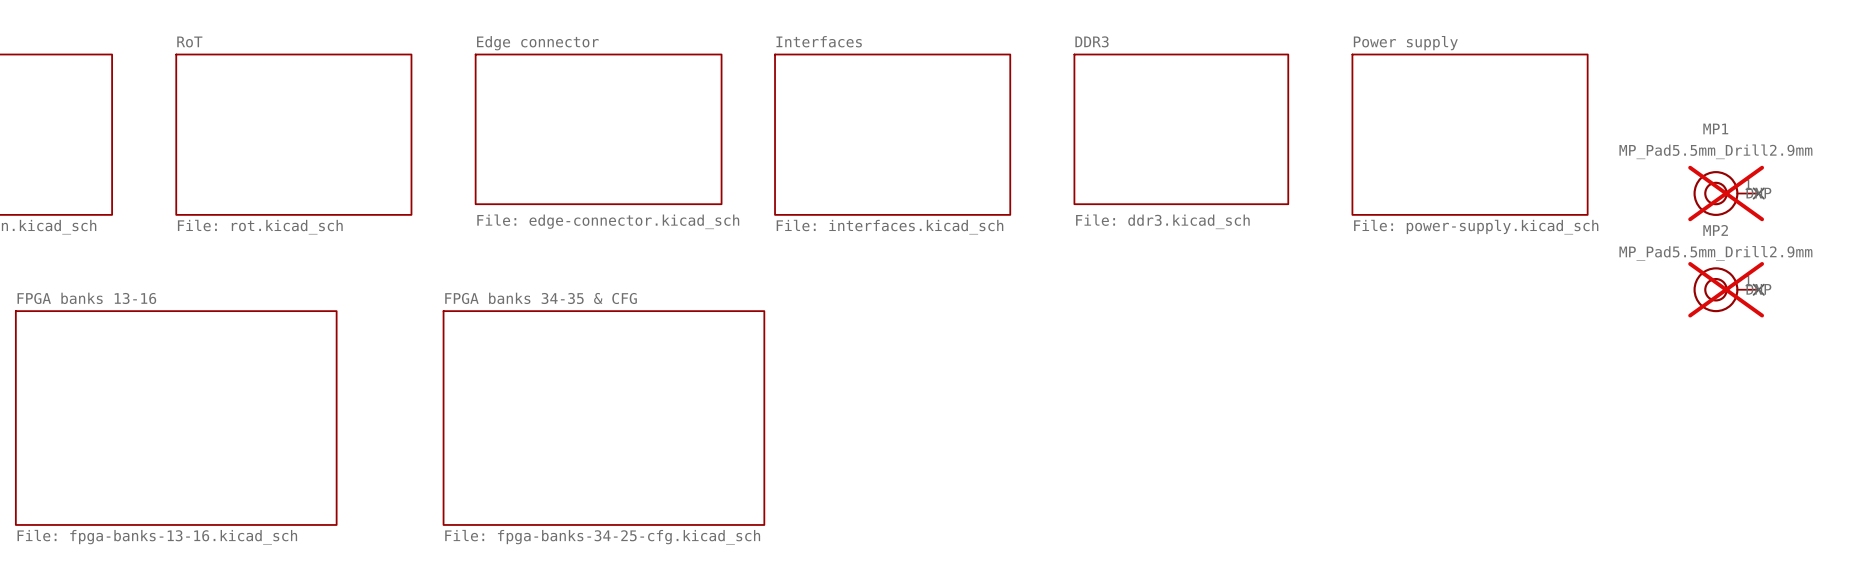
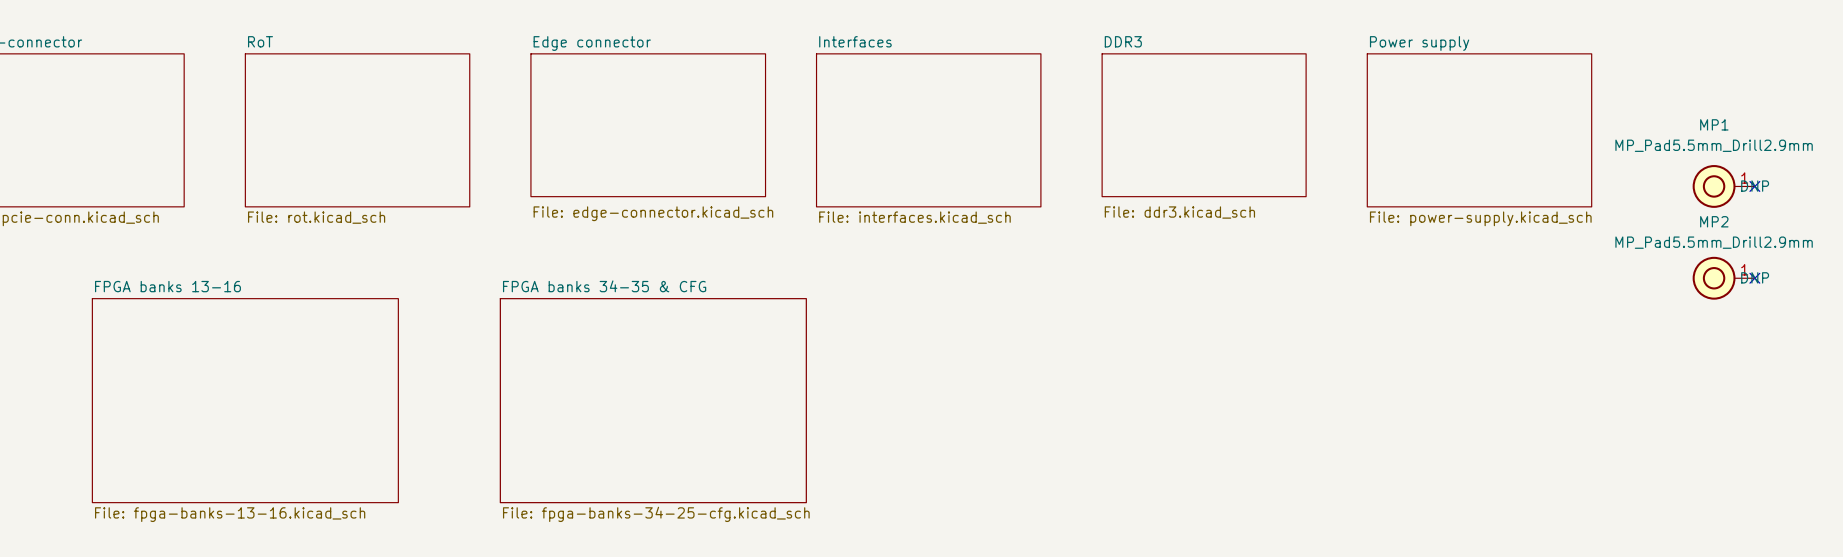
MP1 do-not-place cross: (1726, 193) -> none
MP2 do-not-place cross: (1726, 289) -> none

